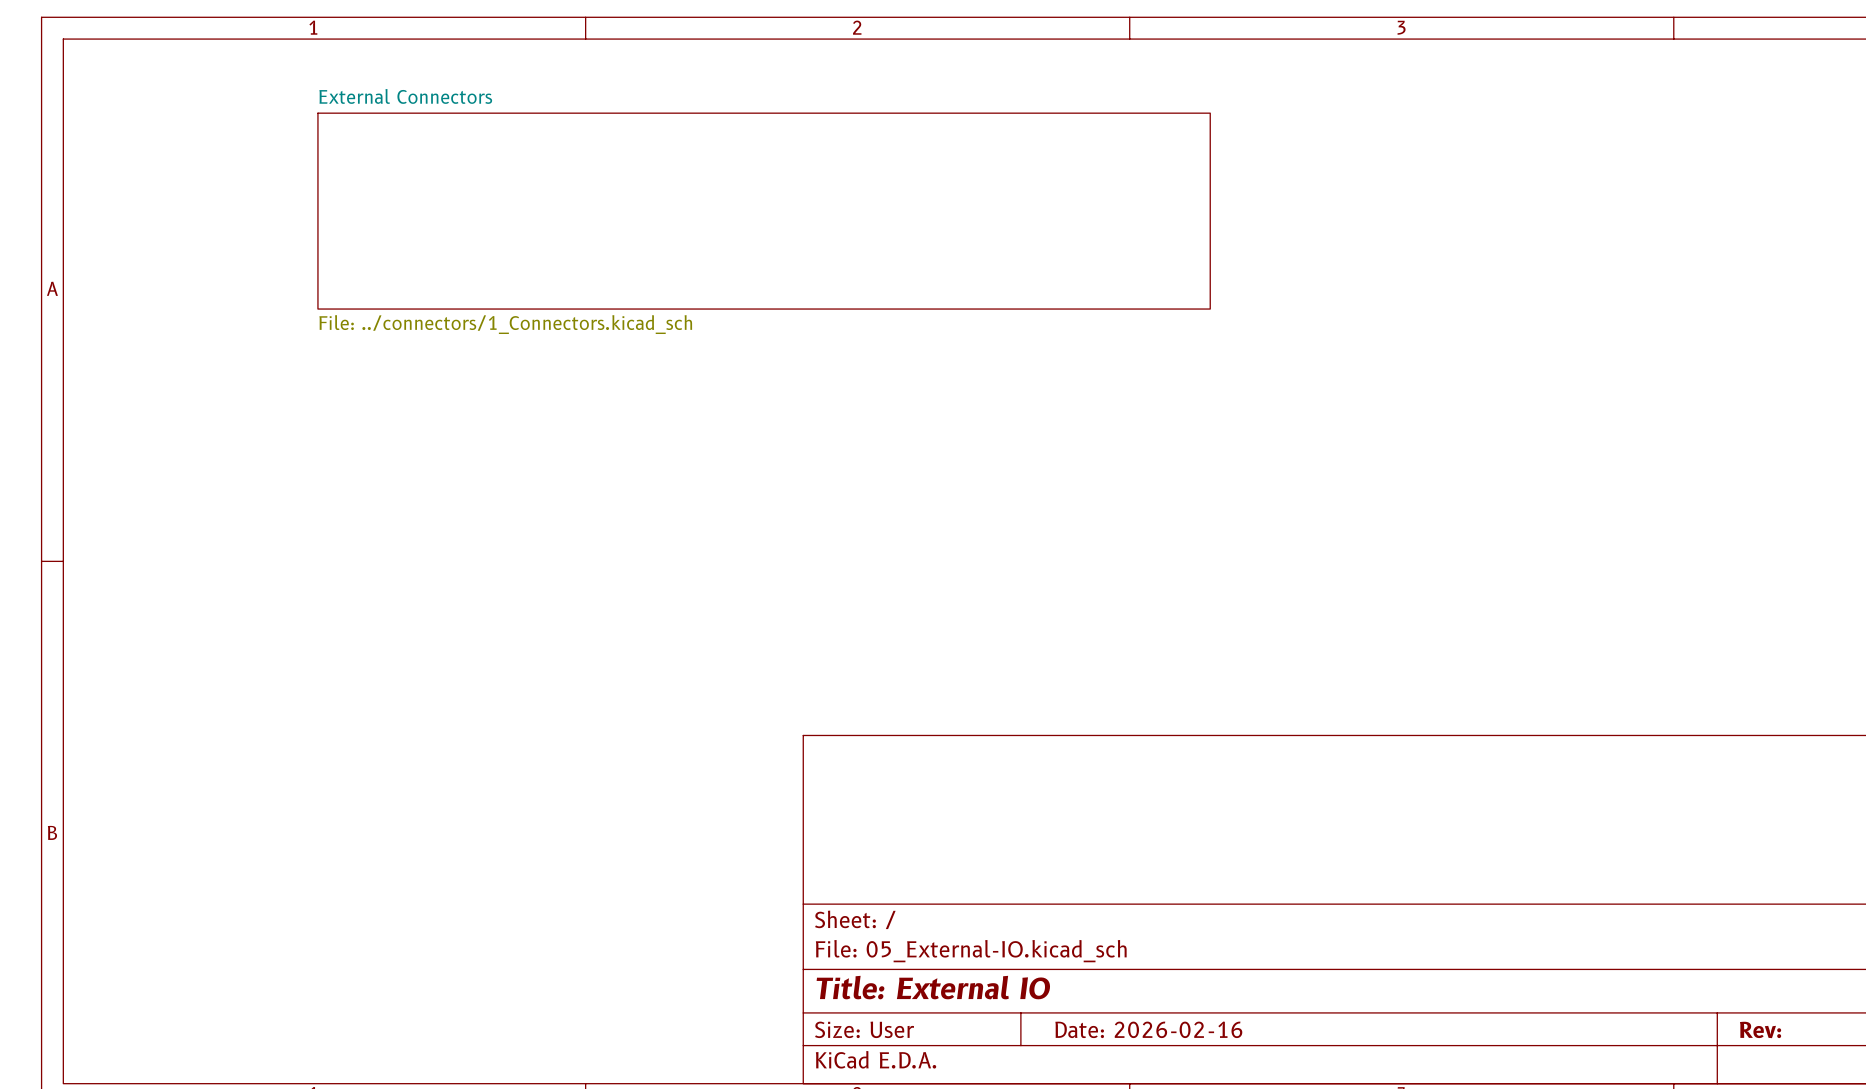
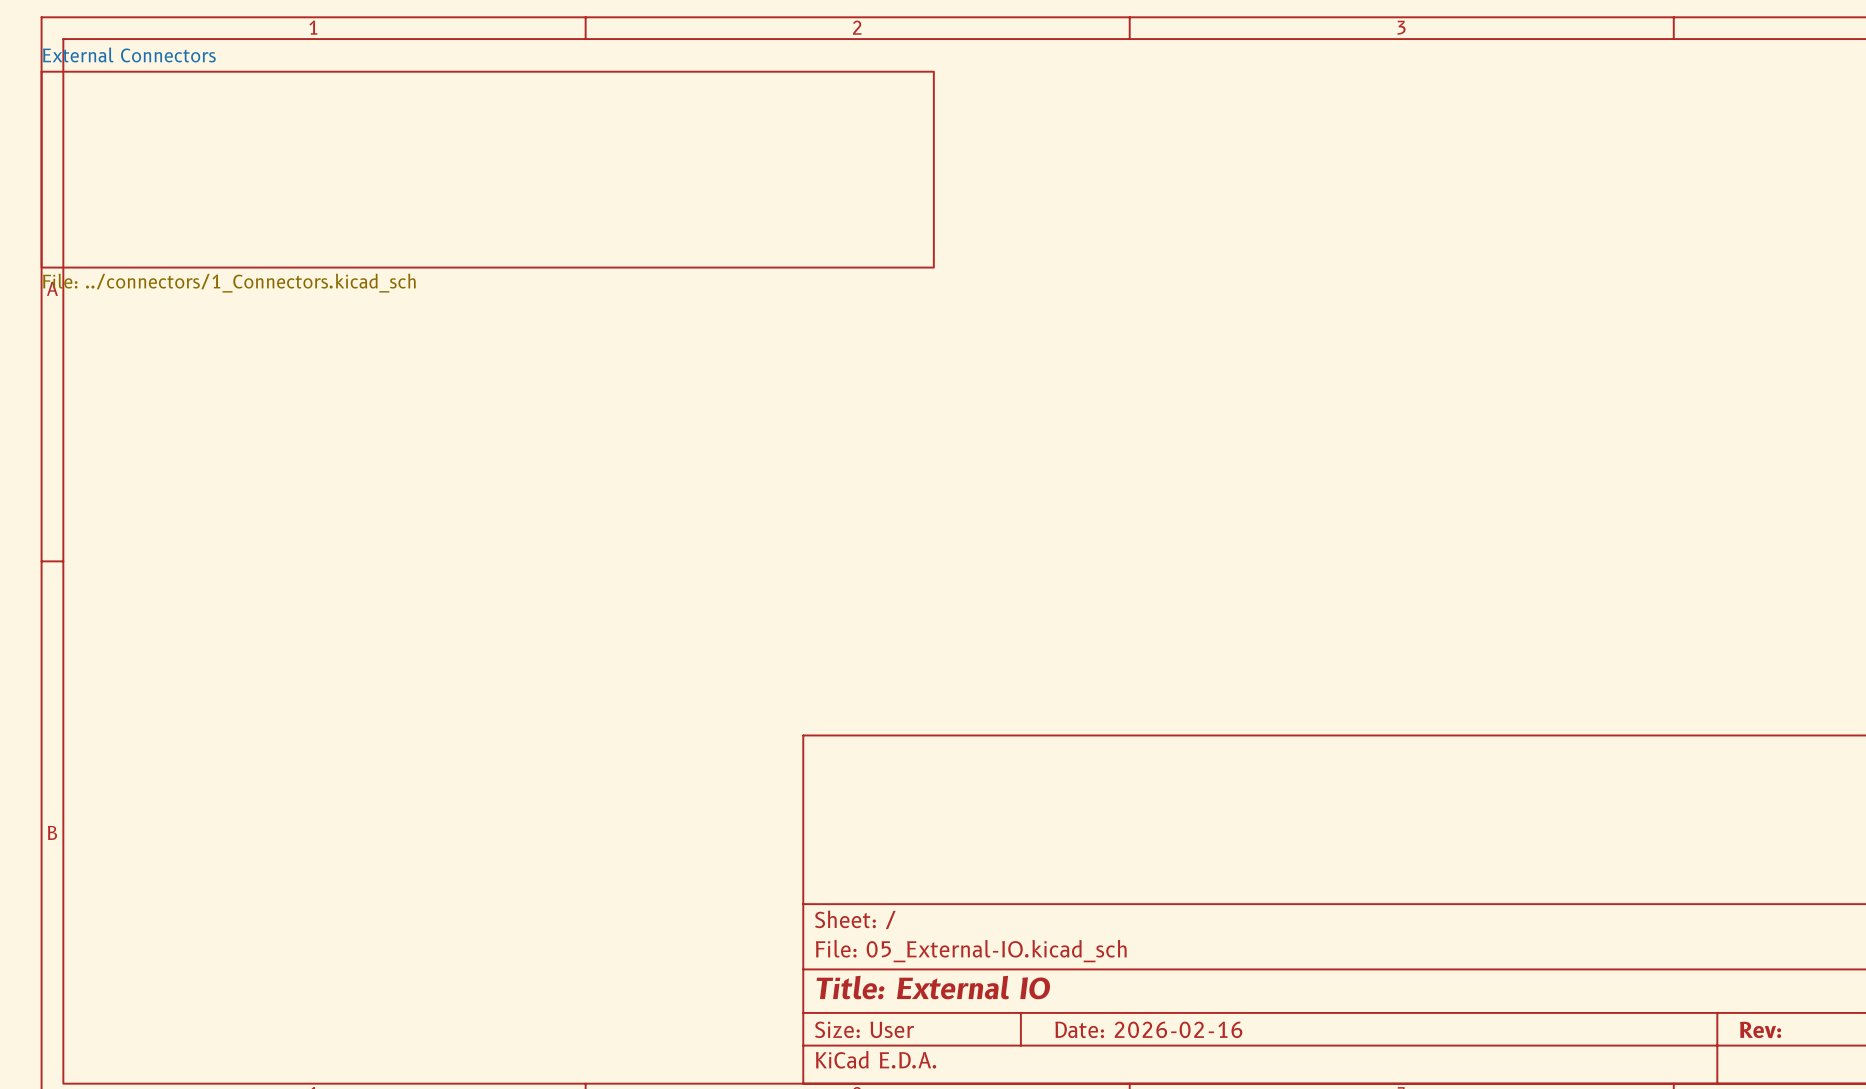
sheet External Connectors: none -> File: ../connectors/1_Connectors.kicad_sch (487, 169)
sheet External Connectors: File: ../connectors/1_Connectors.kicad_sch (764, 211) -> none

